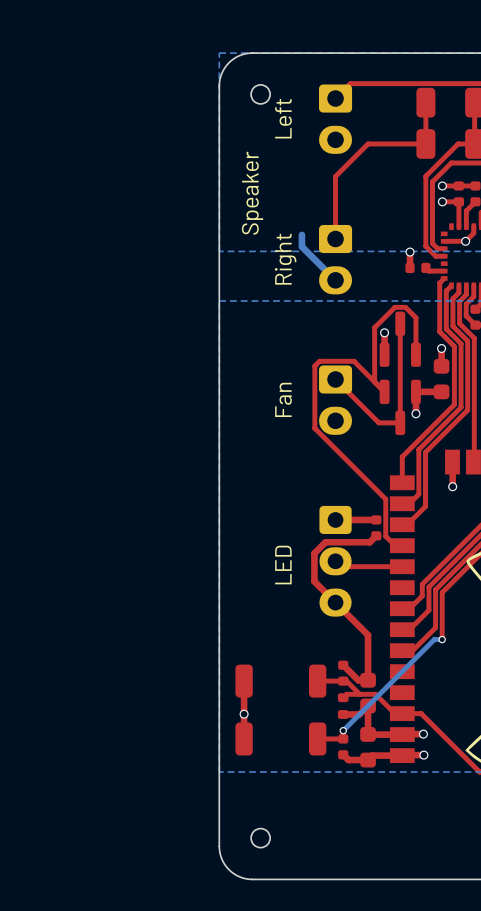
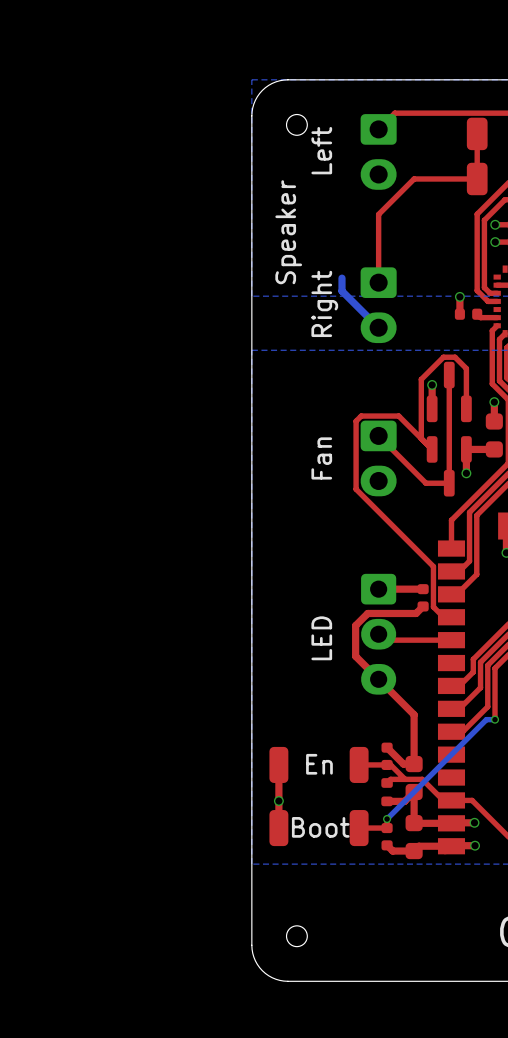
text: none -> En (319, 764)
text: none -> Boot (320, 827)

